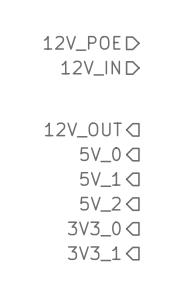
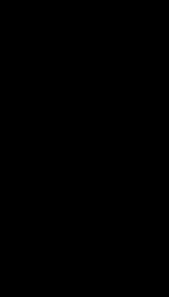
hierarchical label: 12V_POE (82, 43) -> none
hierarchical label: 12V_IN (90, 68) -> none
hierarchical label: 12V_OUT (83, 130) -> none
hierarchical label: 5V_0 (100, 154) -> none
hierarchical label: 5V_1 (100, 179) -> none
hierarchical label: 5V_2 (100, 204) -> none
hierarchical label: 3V3_0 (94, 228) -> none
hierarchical label: 3V3_1 (94, 253) -> none

